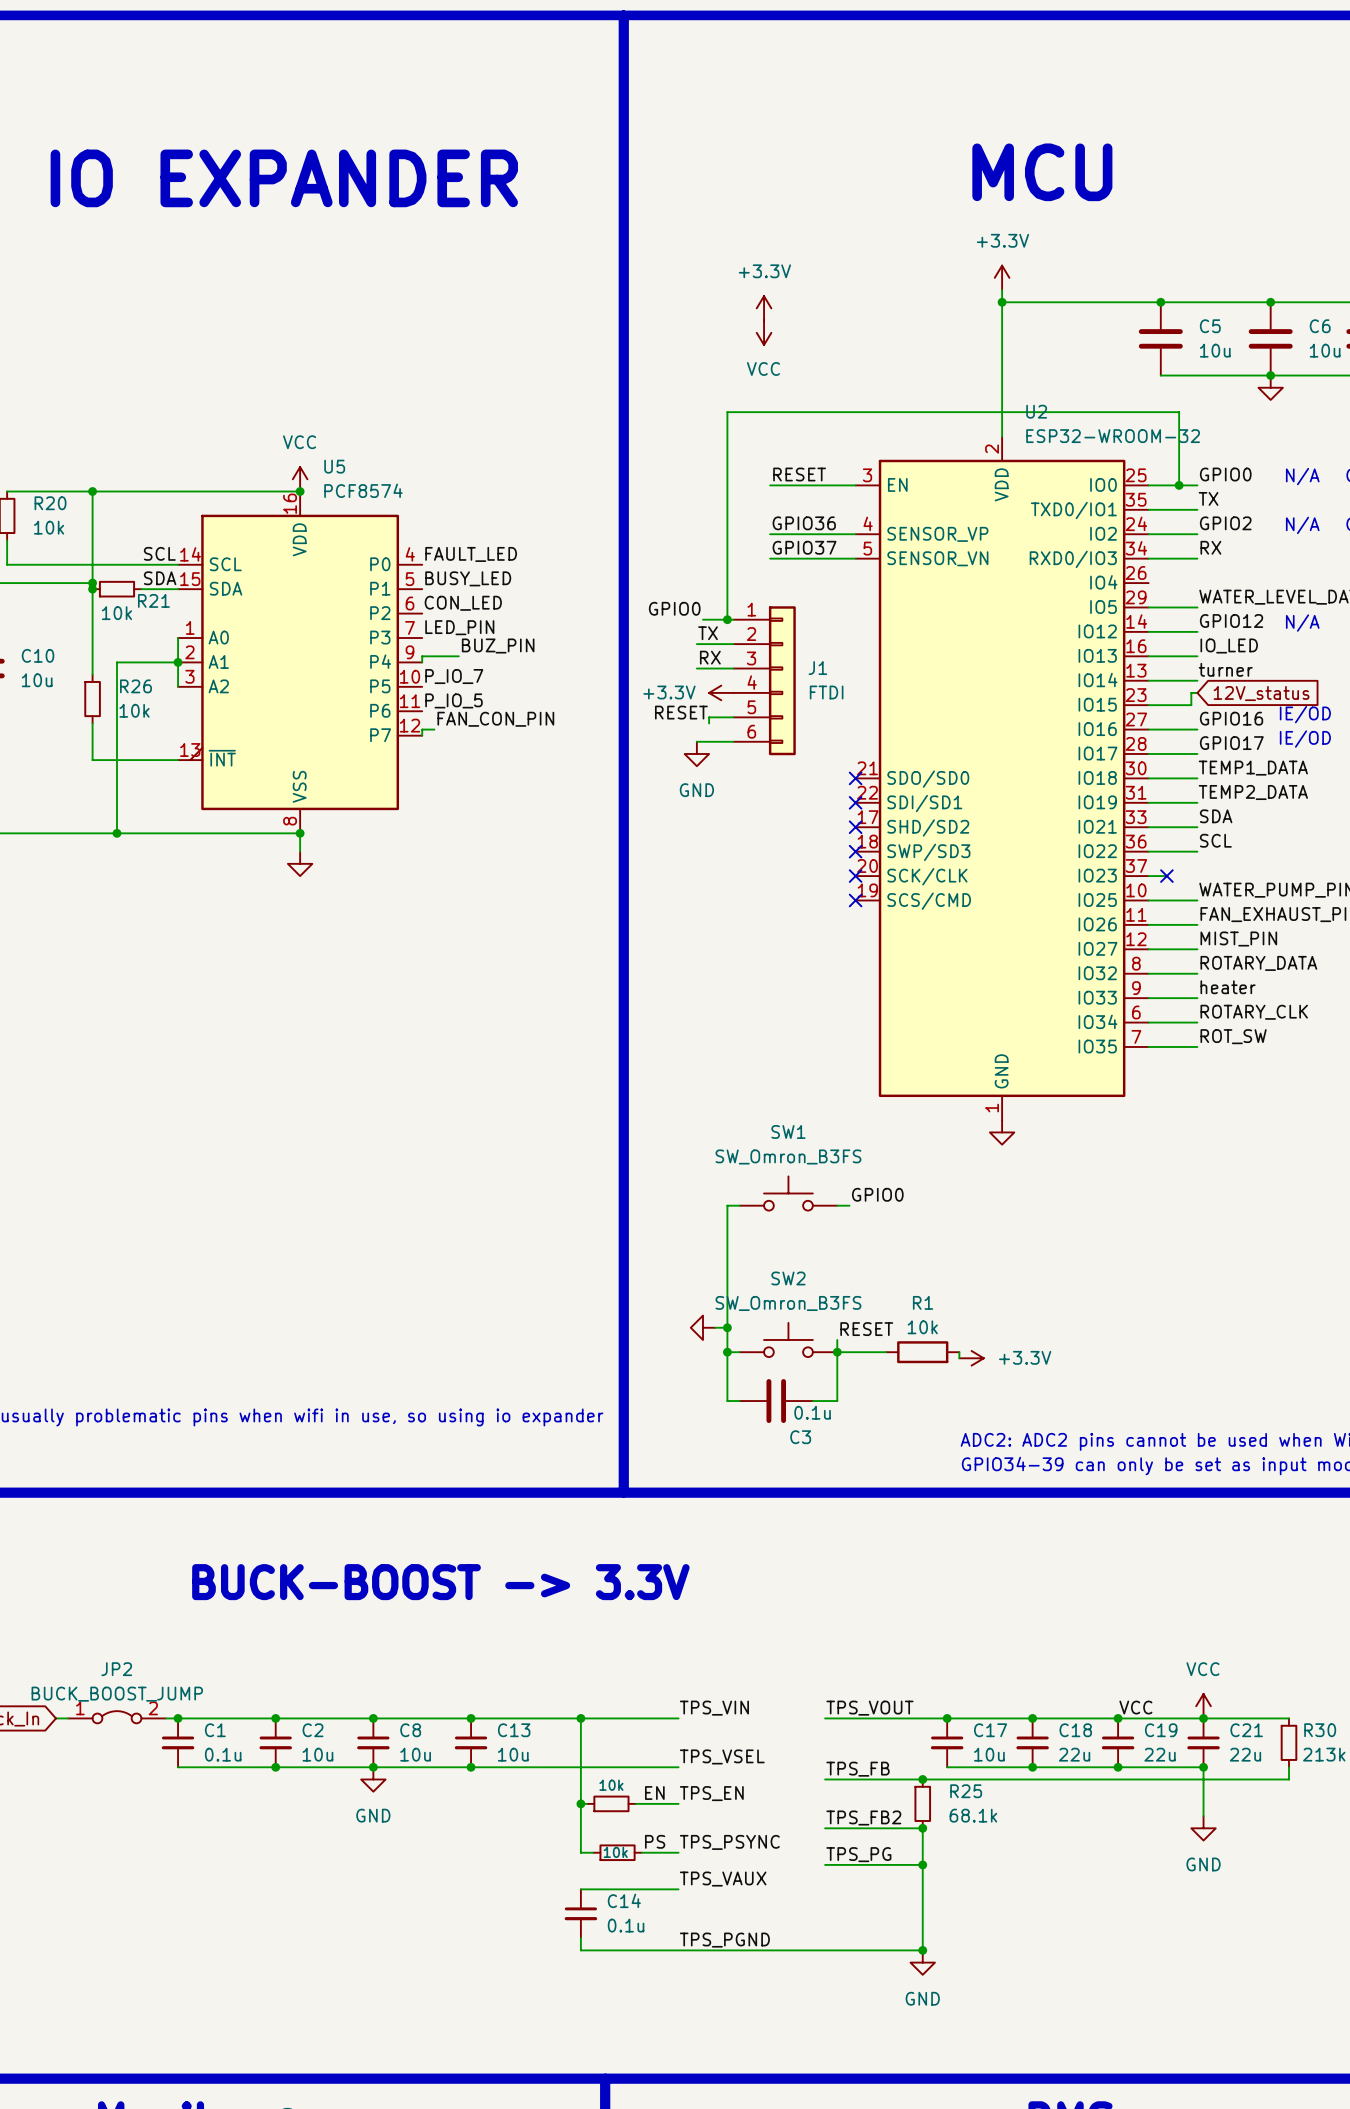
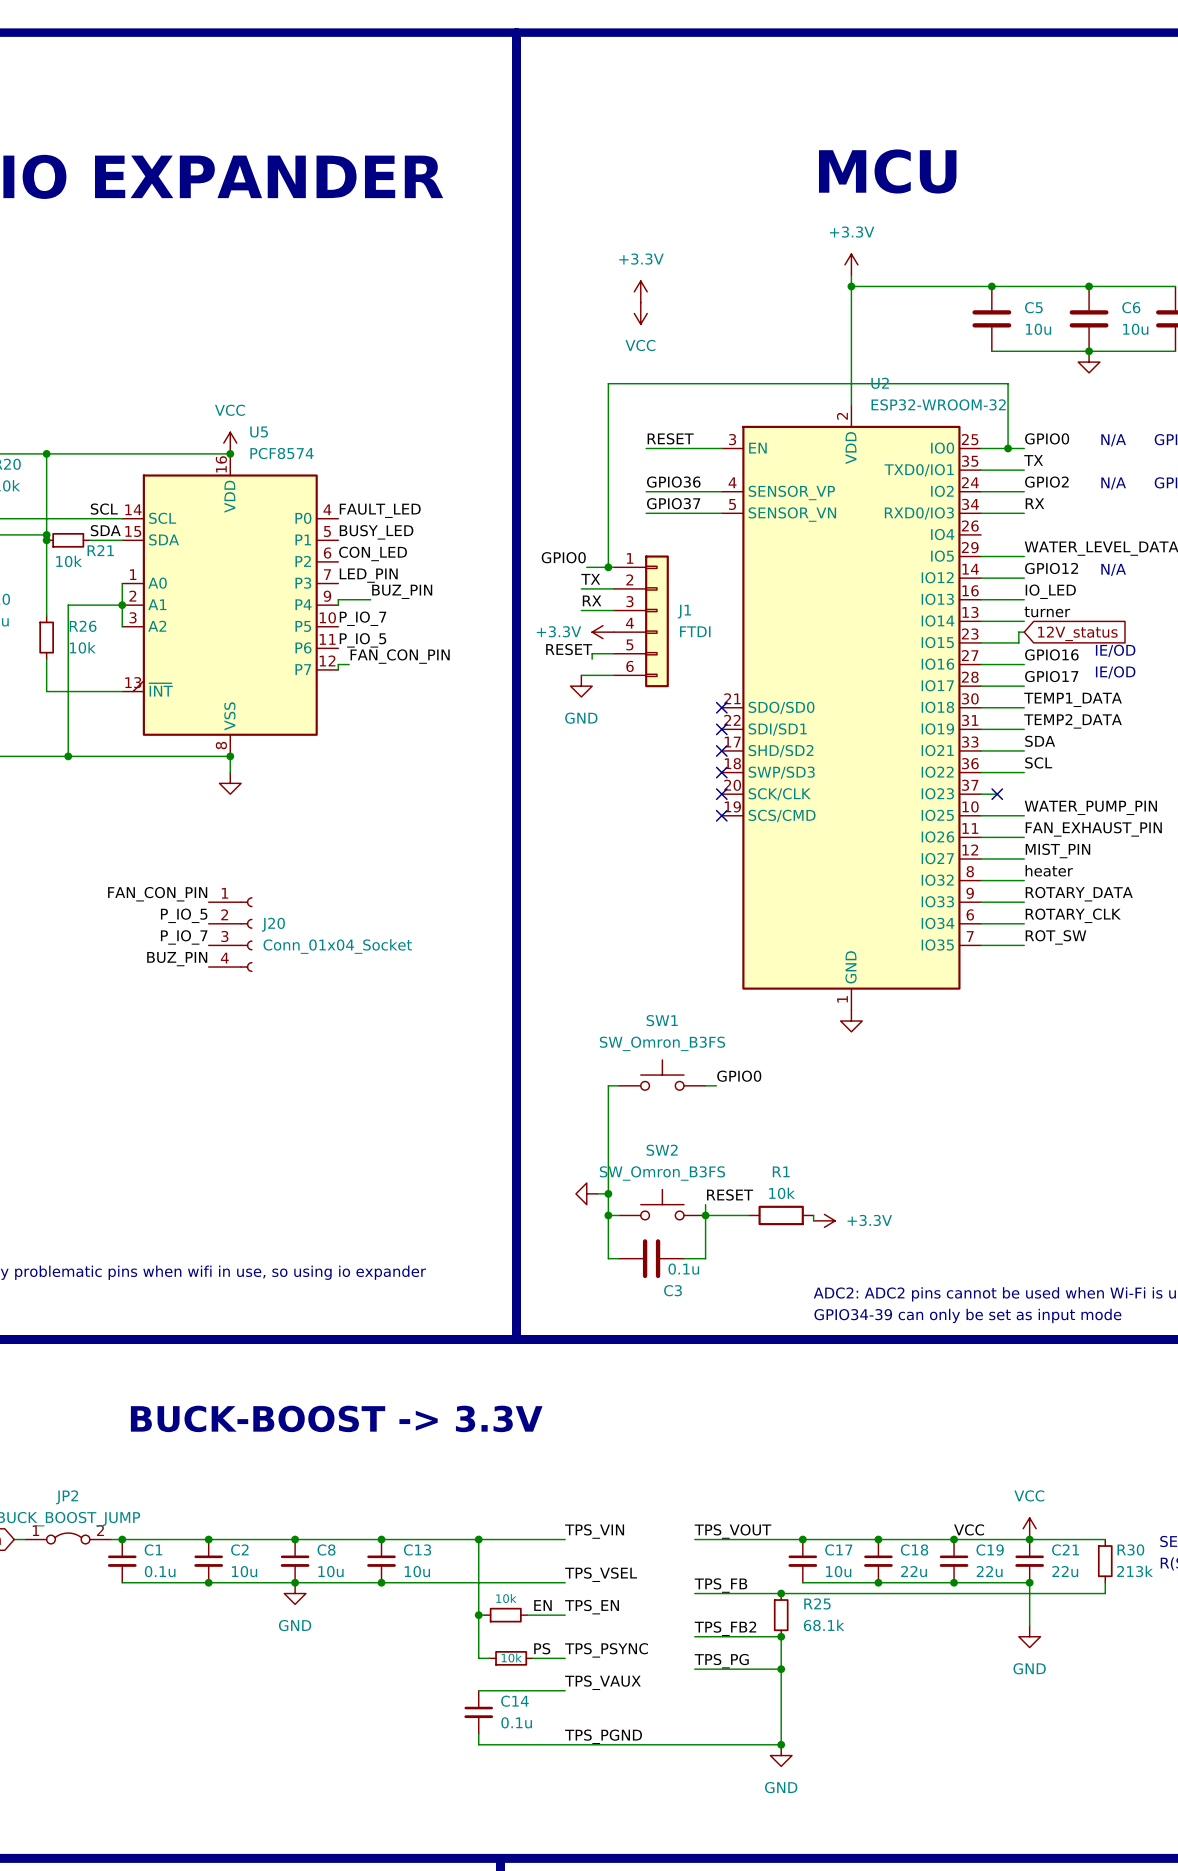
label: ROTARY_DATA (1258, 963) -> heater (1049, 870)
label: none -> FAN_CON_PIN (157, 894)
label: heater (1228, 987) -> ROTARY_DATA (1079, 894)
label: none -> P_IO_5 (184, 915)
J20: none -> Conn_01x04_Socket (230, 934)
label: none -> P_IO_7 (184, 937)
label: none -> BUZ_PIN (177, 959)

